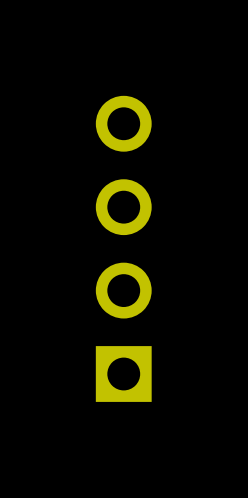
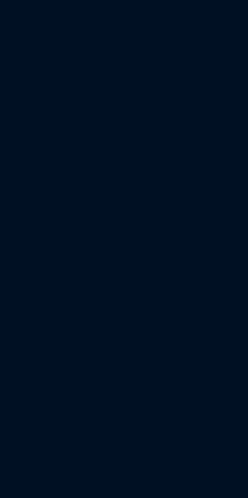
part: (123, 248) -> none

